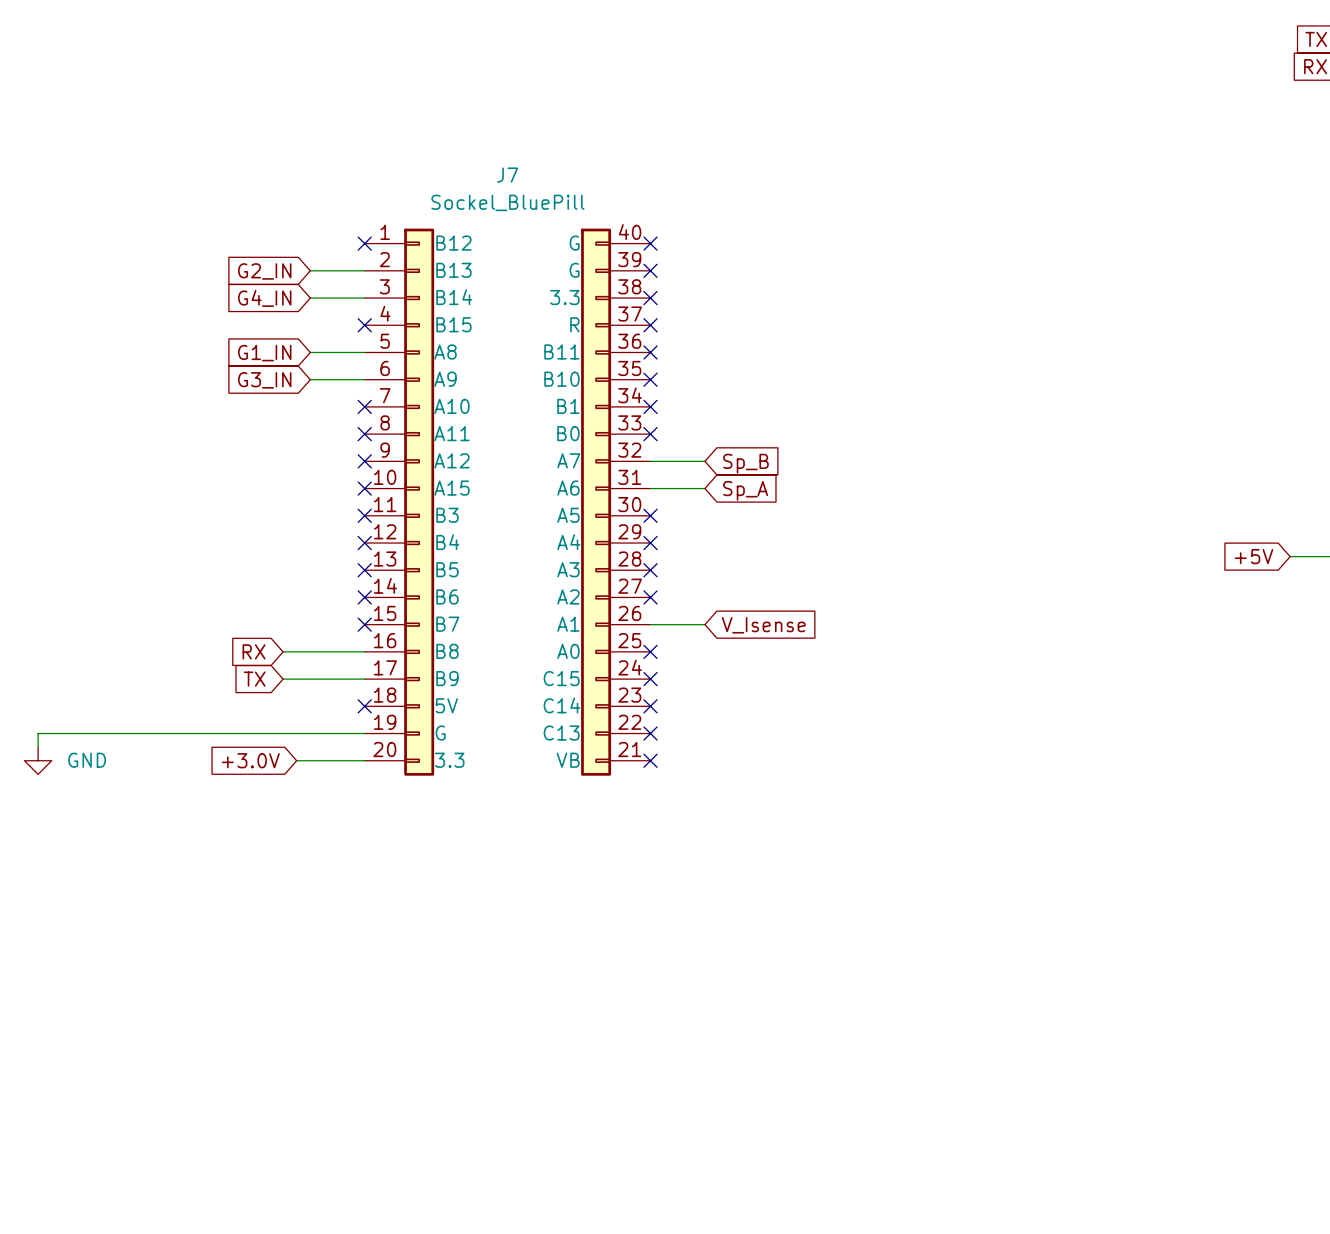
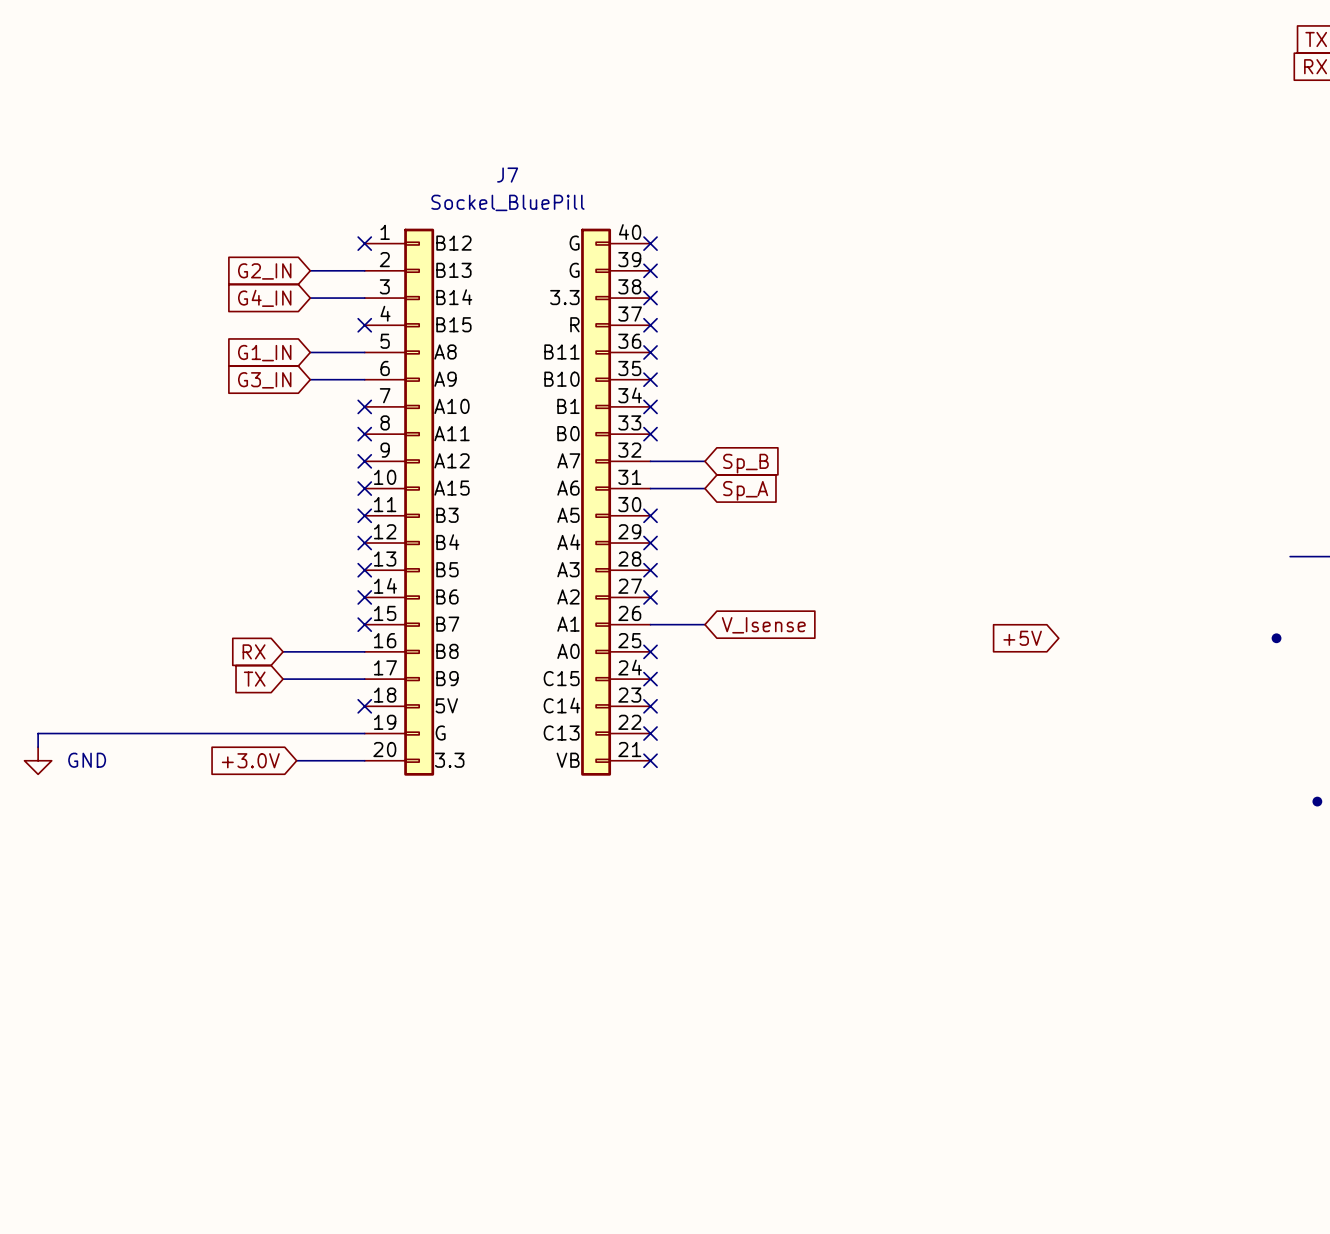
global label position: +5V (1253, 556) -> +5V (1022, 638)
junction: none -> (1276, 638)
junction: none -> (1317, 801)

